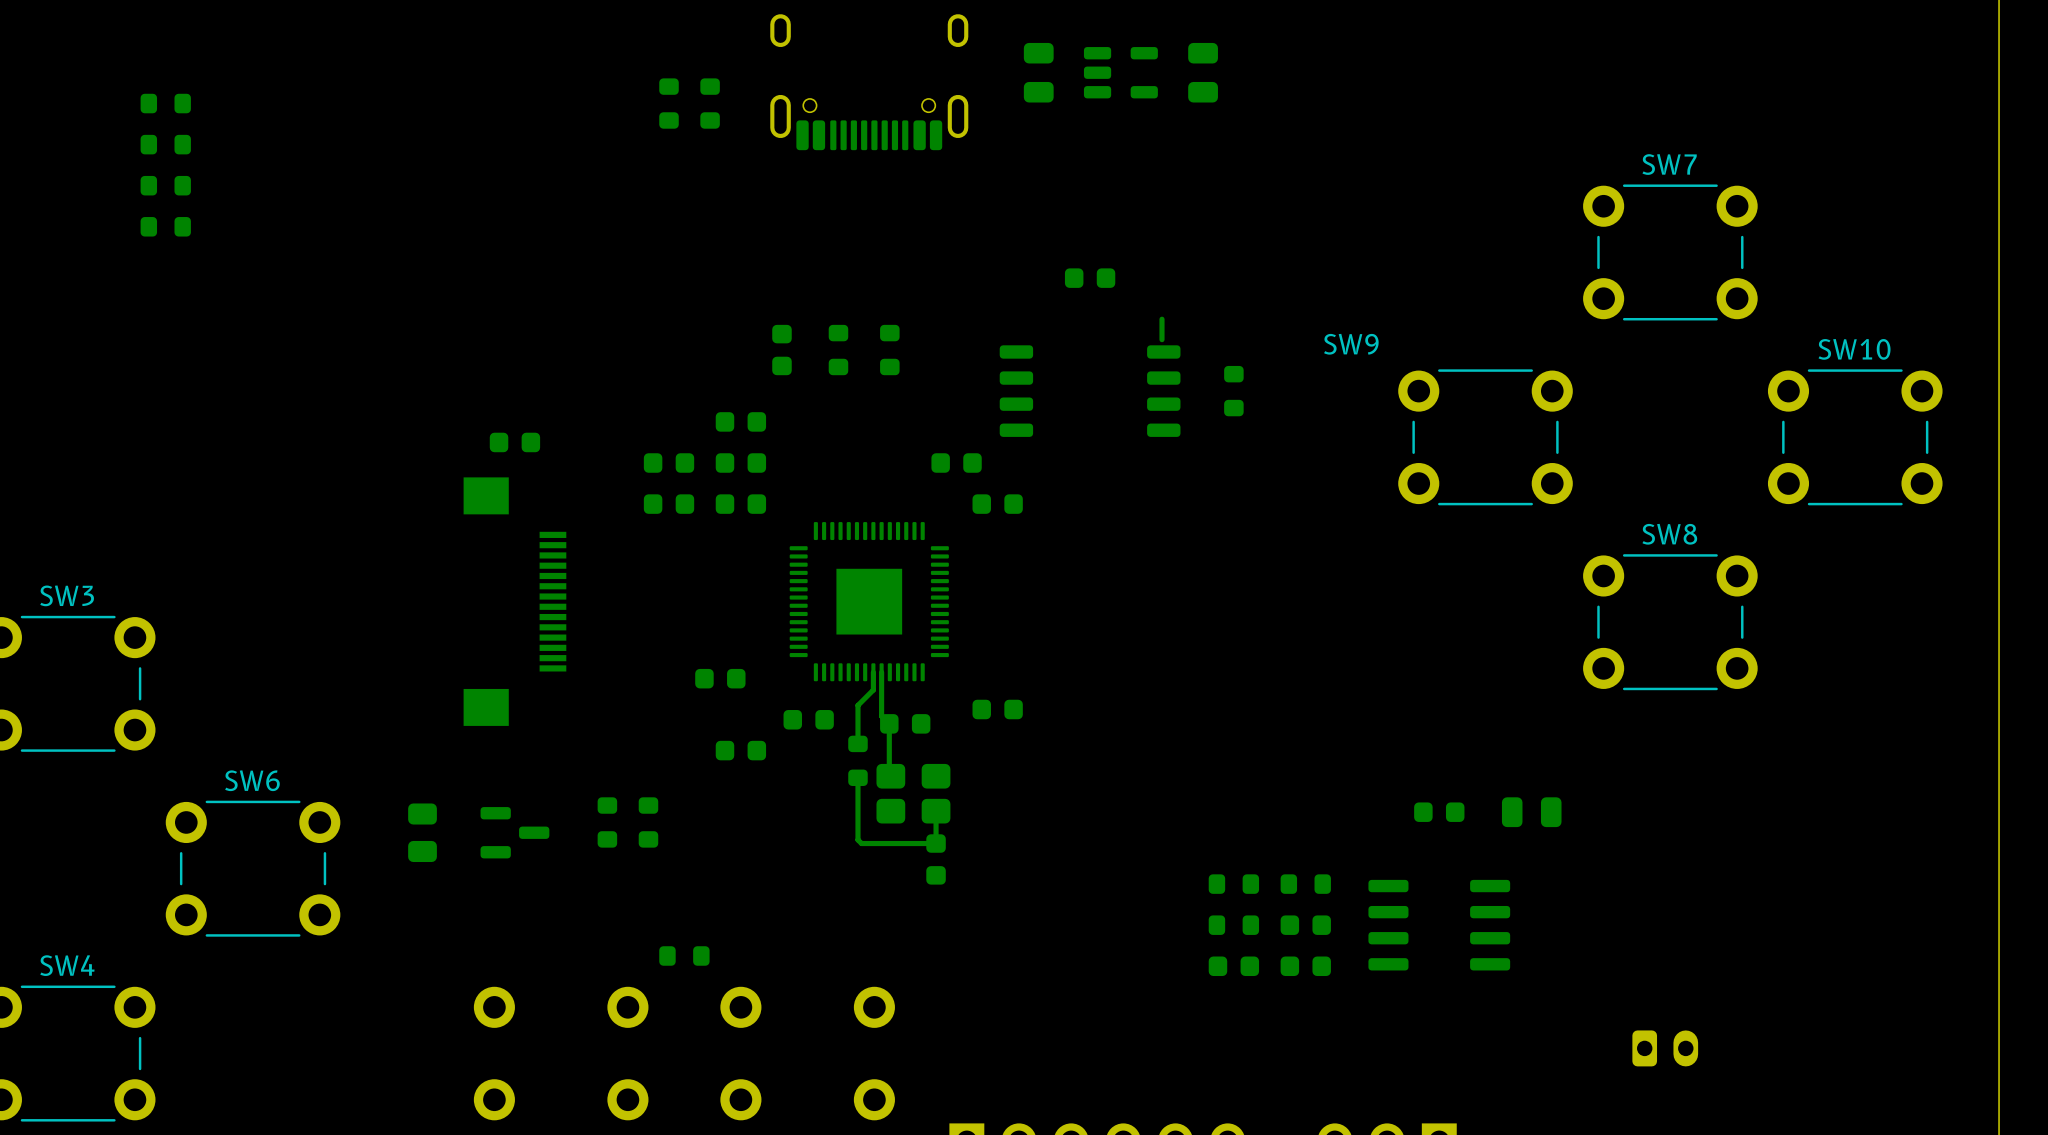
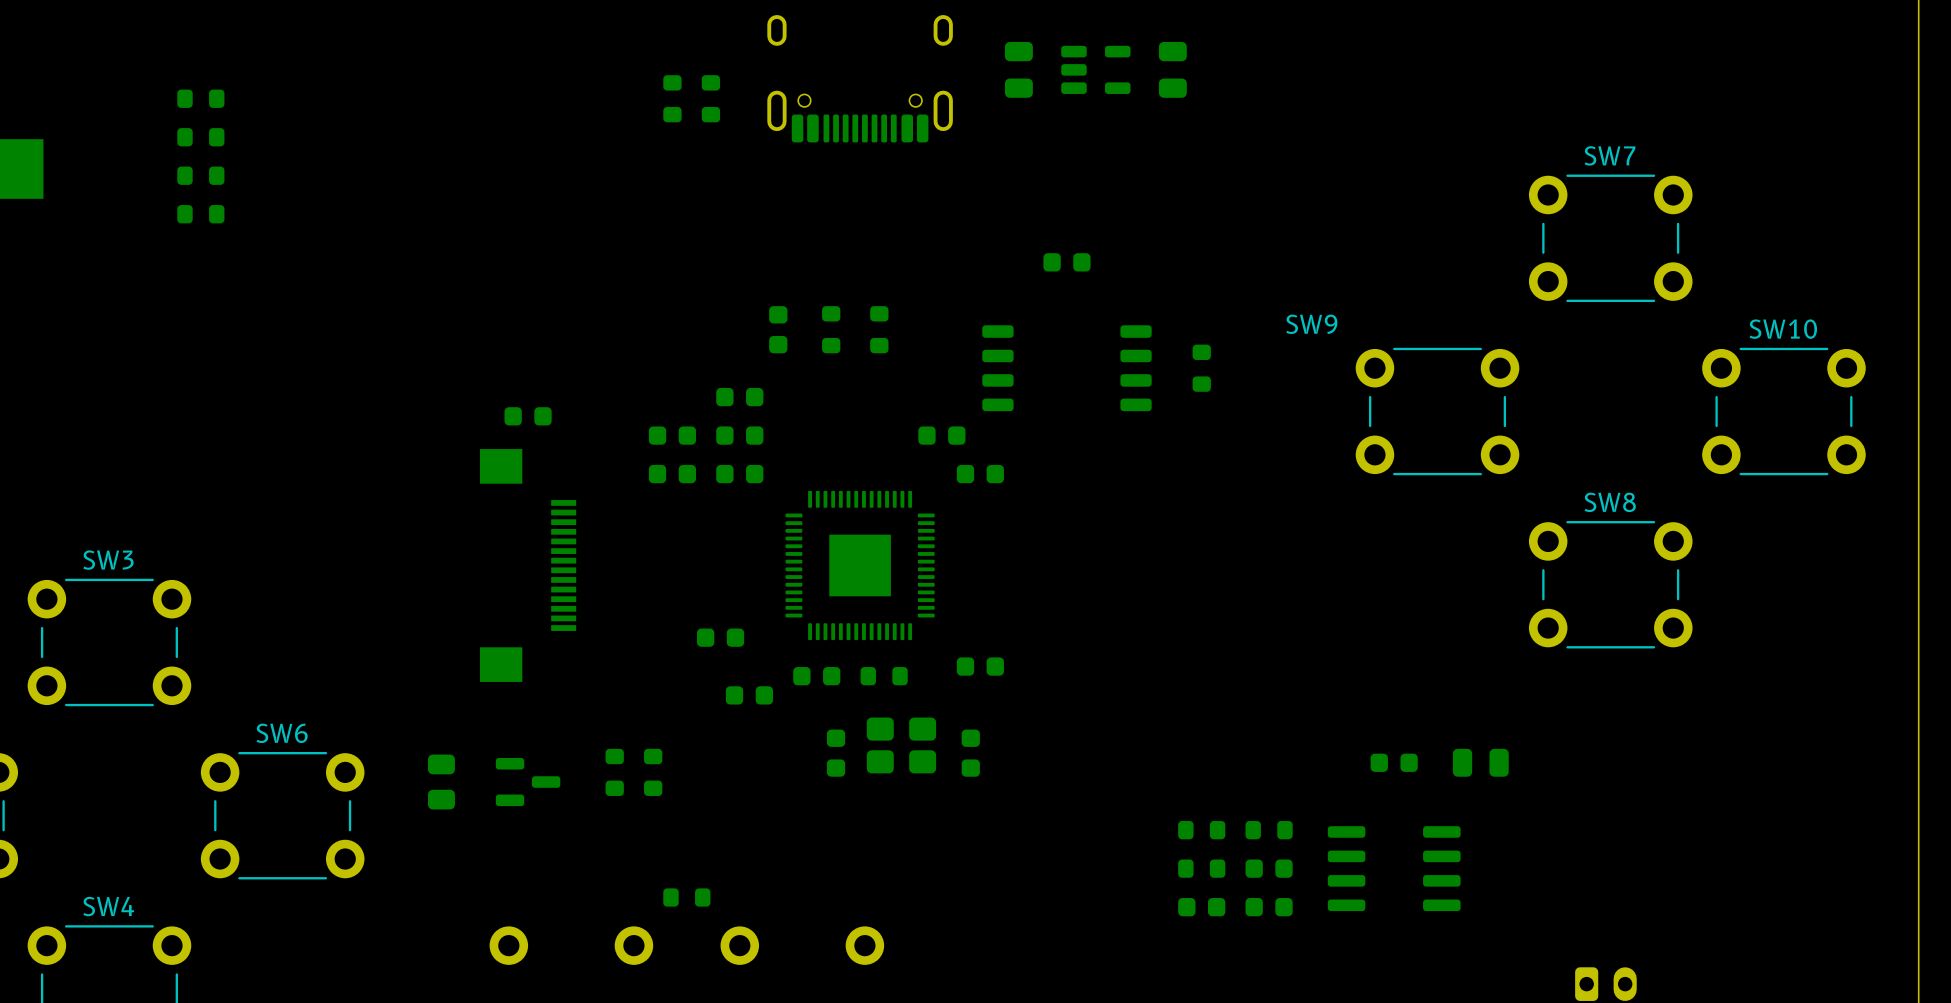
bottom track: (1161, 319) (1161, 339) -> none
bottom track: (873, 672) (873, 689) (857, 705) (857, 743) -> none
bottom track: (881, 672) (881, 716) (889, 723) (890, 776) -> none
part footprint: [880, 714, 931, 734] -> [860, 667, 908, 686]
part position: (808, 719) -> (816, 676)
part position: (740, 750) -> (749, 695)
part: (857, 760) -> none
bottom track: (857, 777) (857, 839) (861, 843) (936, 843) (936, 811) -> none
part: none -> (836, 753)
part: none -> (970, 753)
part: (936, 859) -> none

